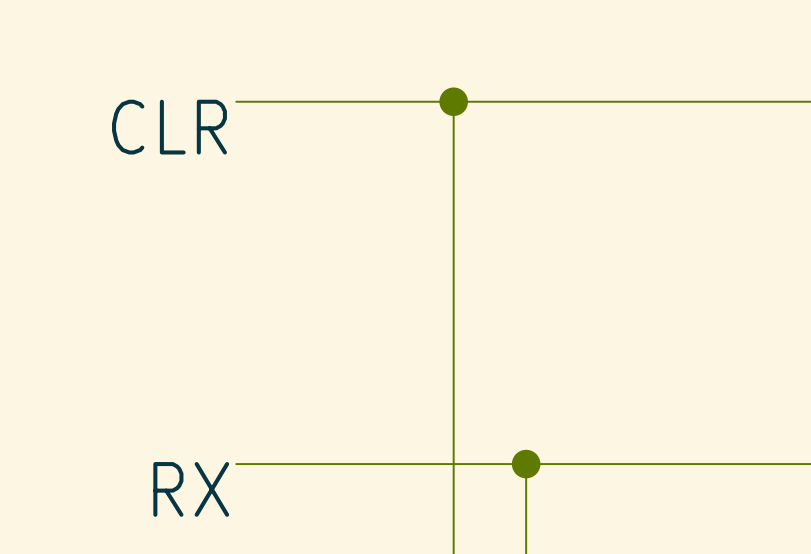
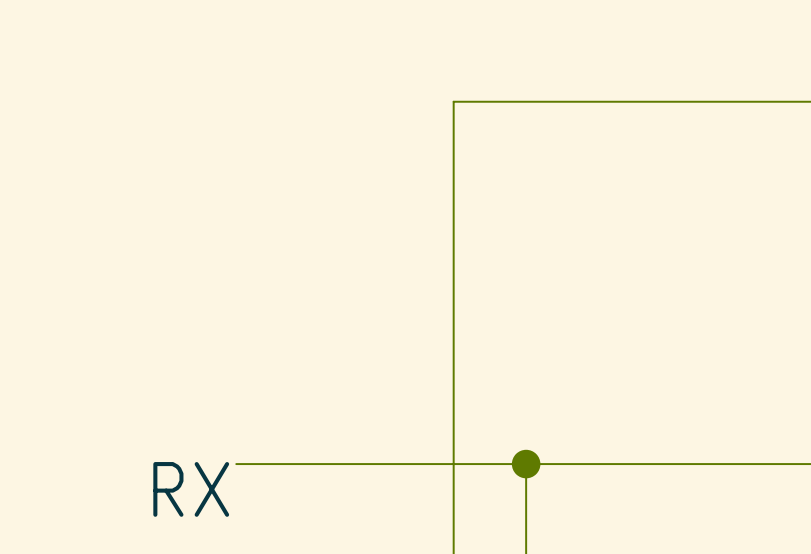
wire: (236, 101) (453, 101) -> none
junction: (453, 101) -> none
label: CLR (169, 127) -> none

